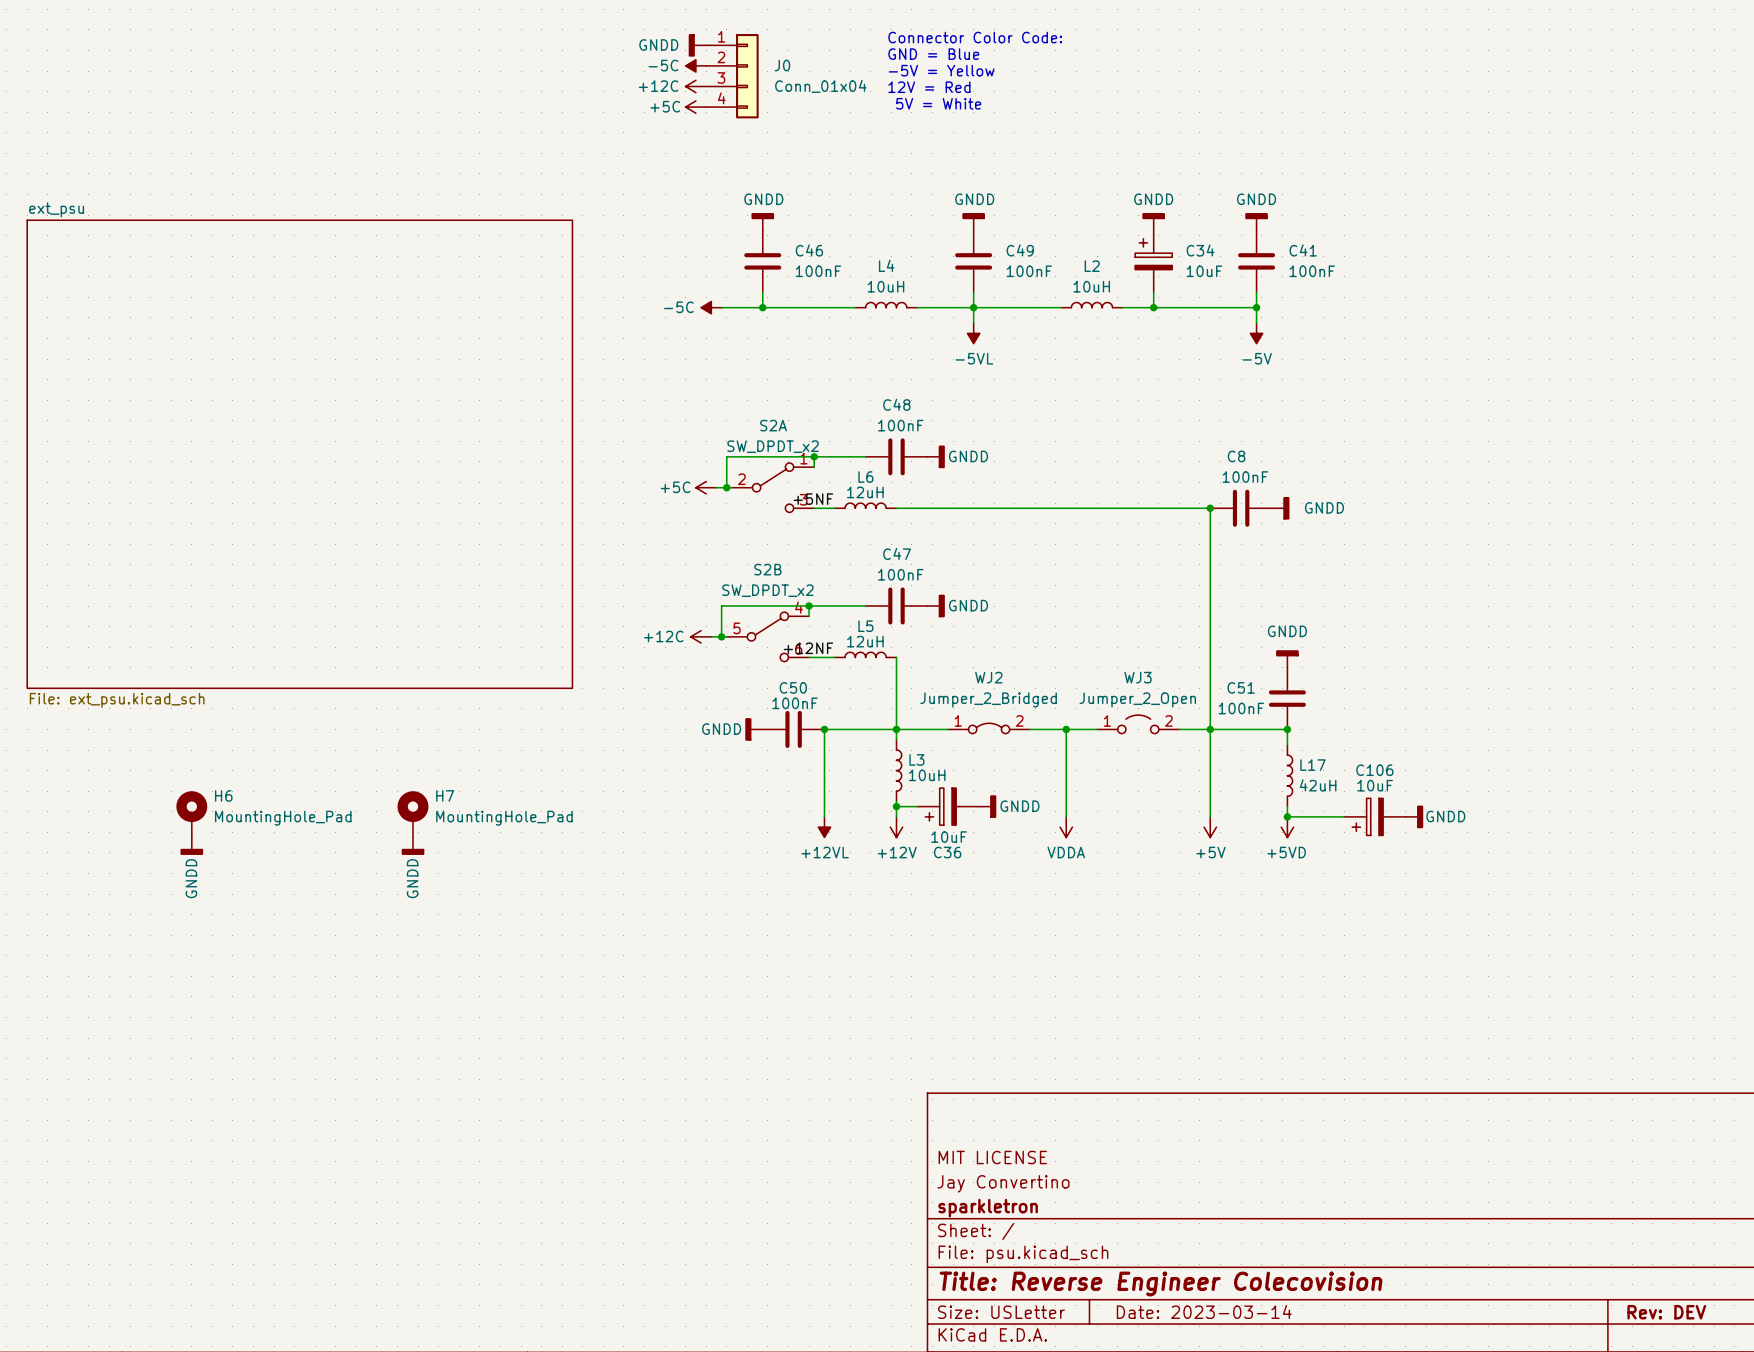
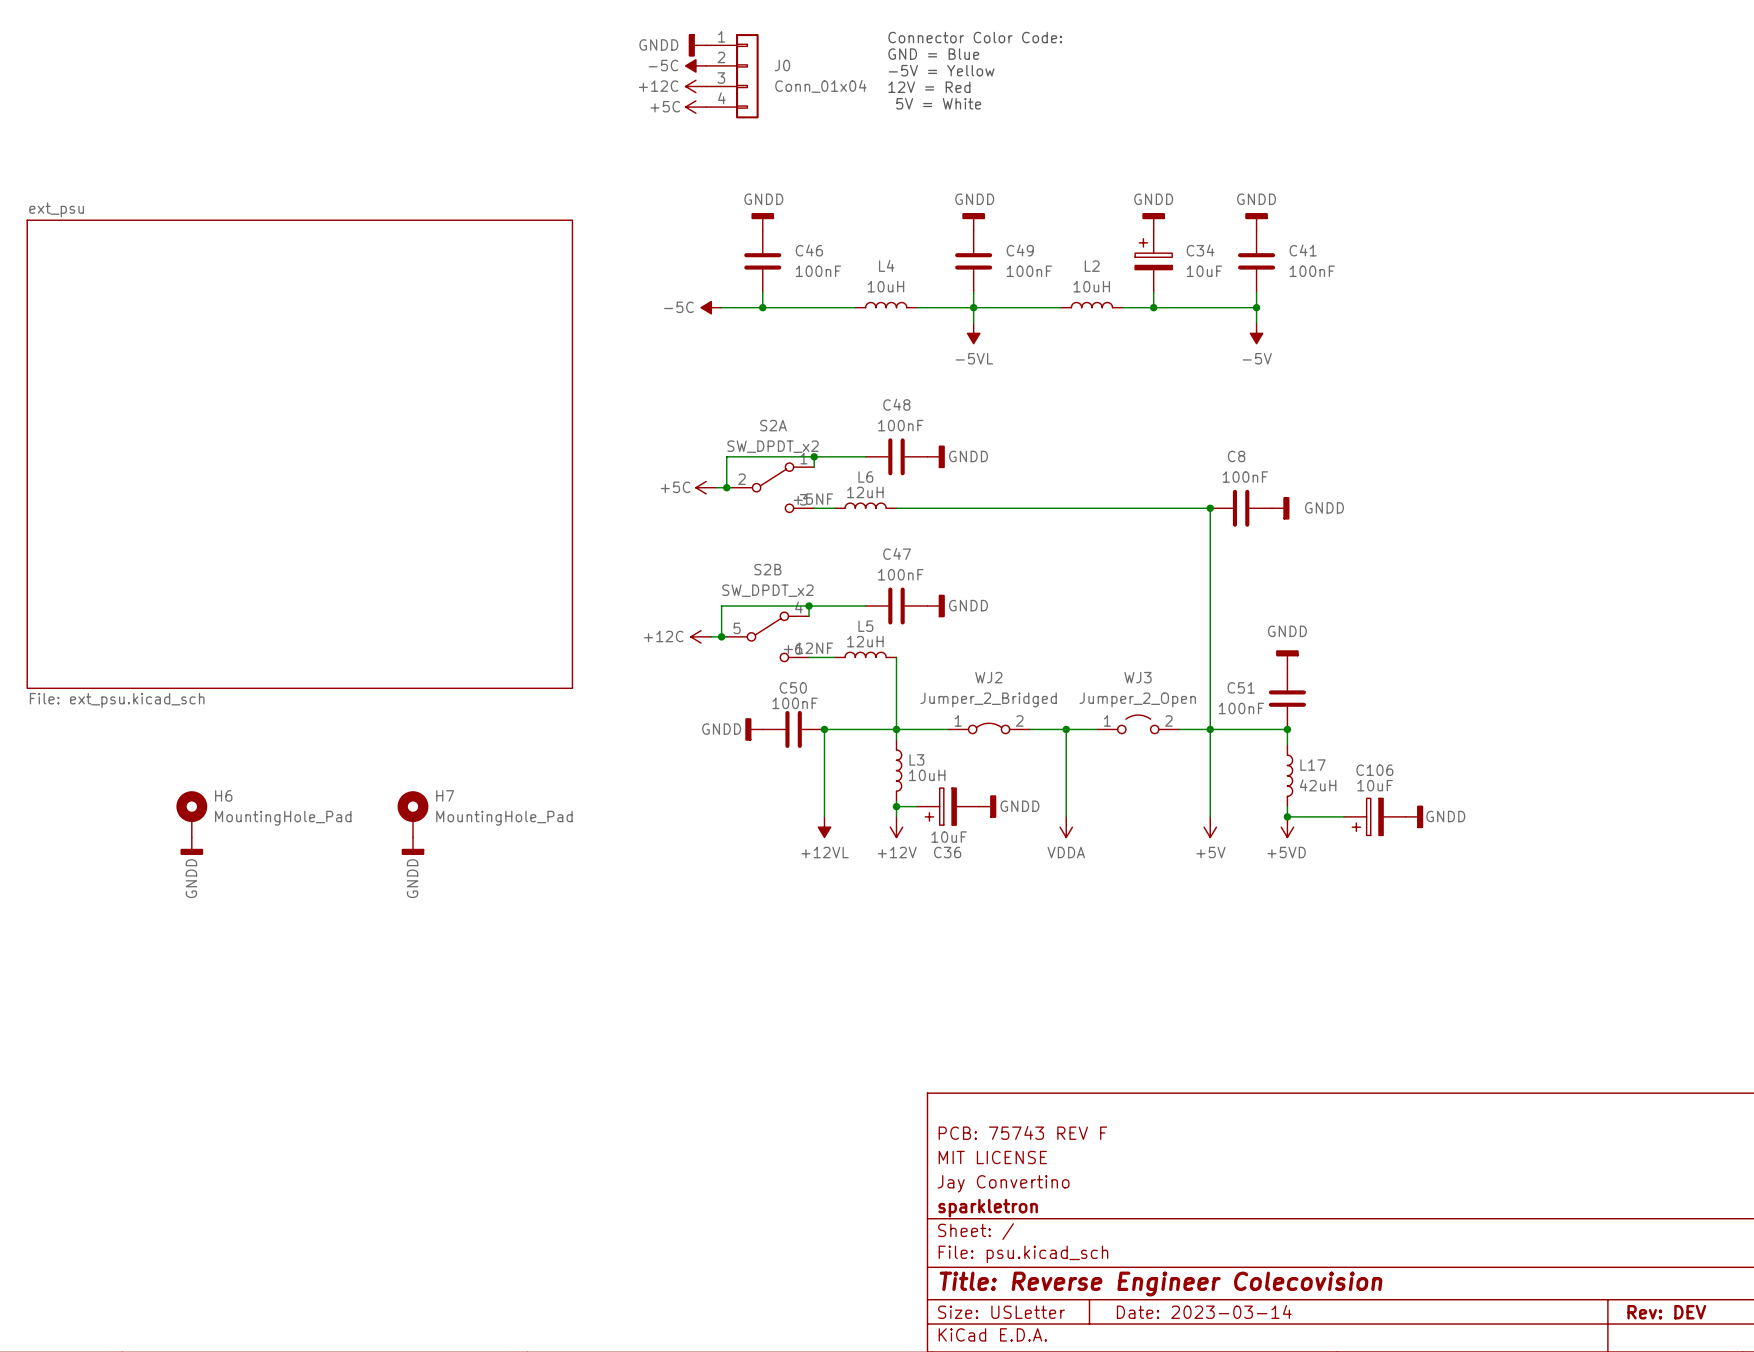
title block: none -> PCB: 75743 REV F (1022, 1132)

